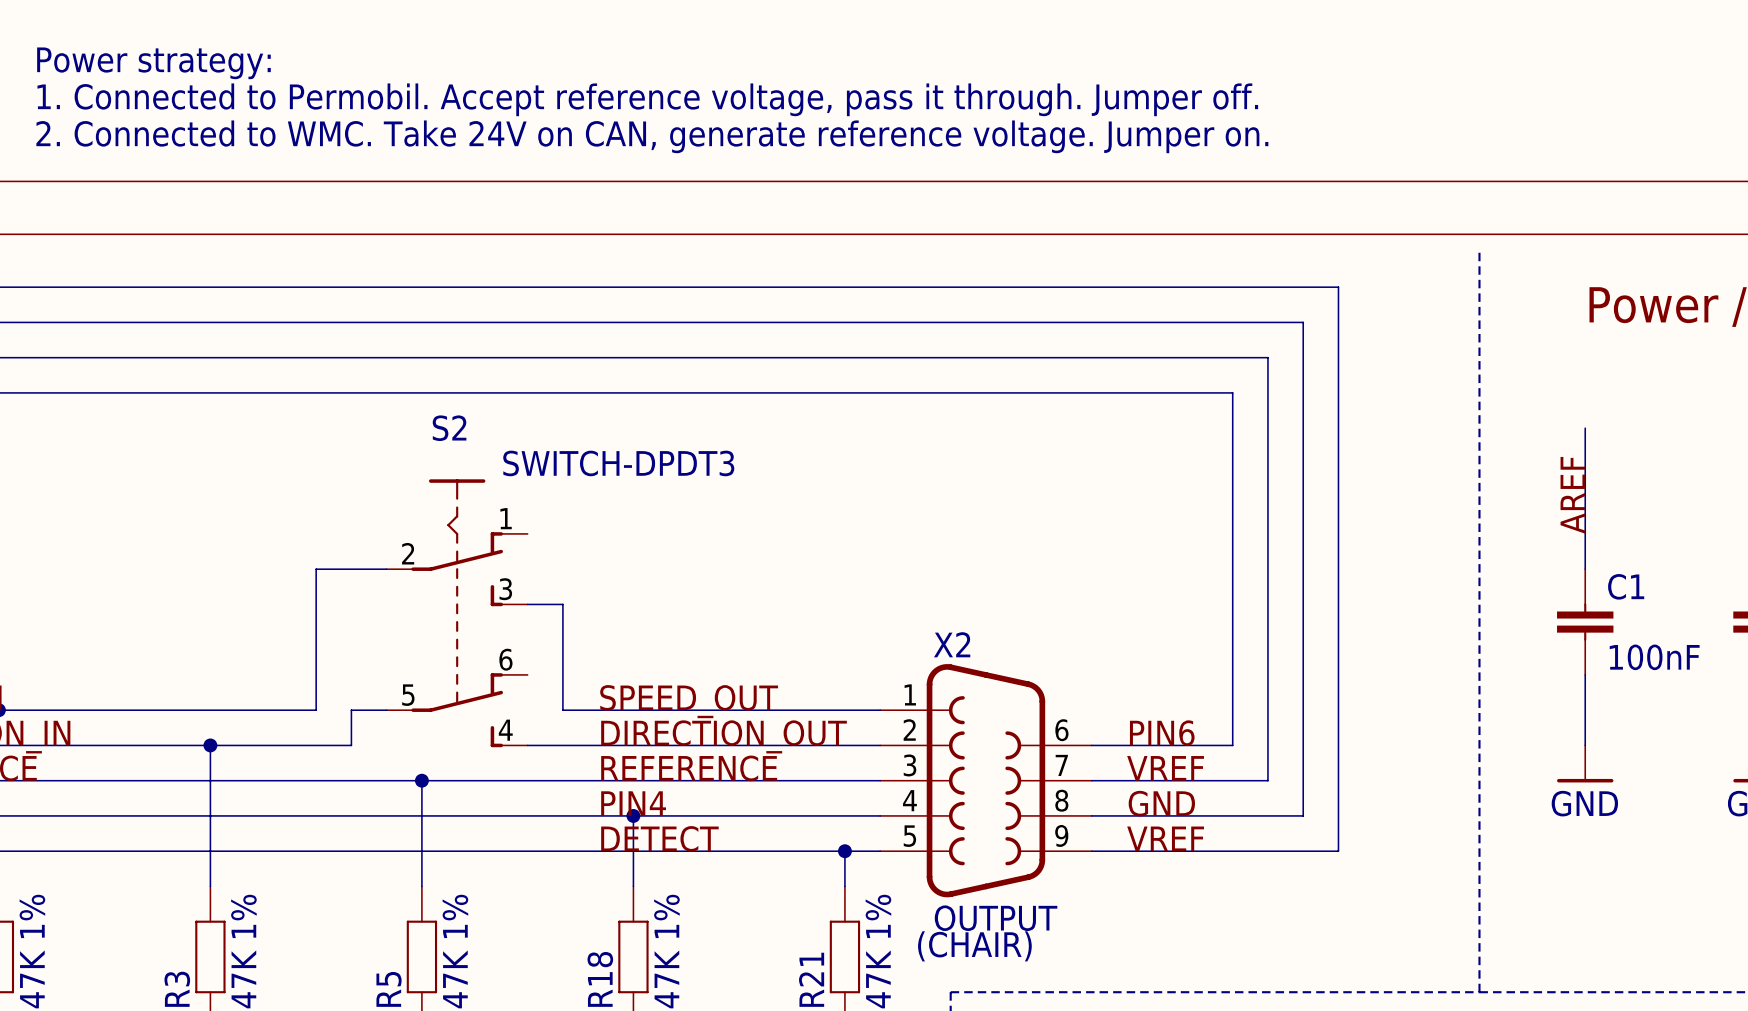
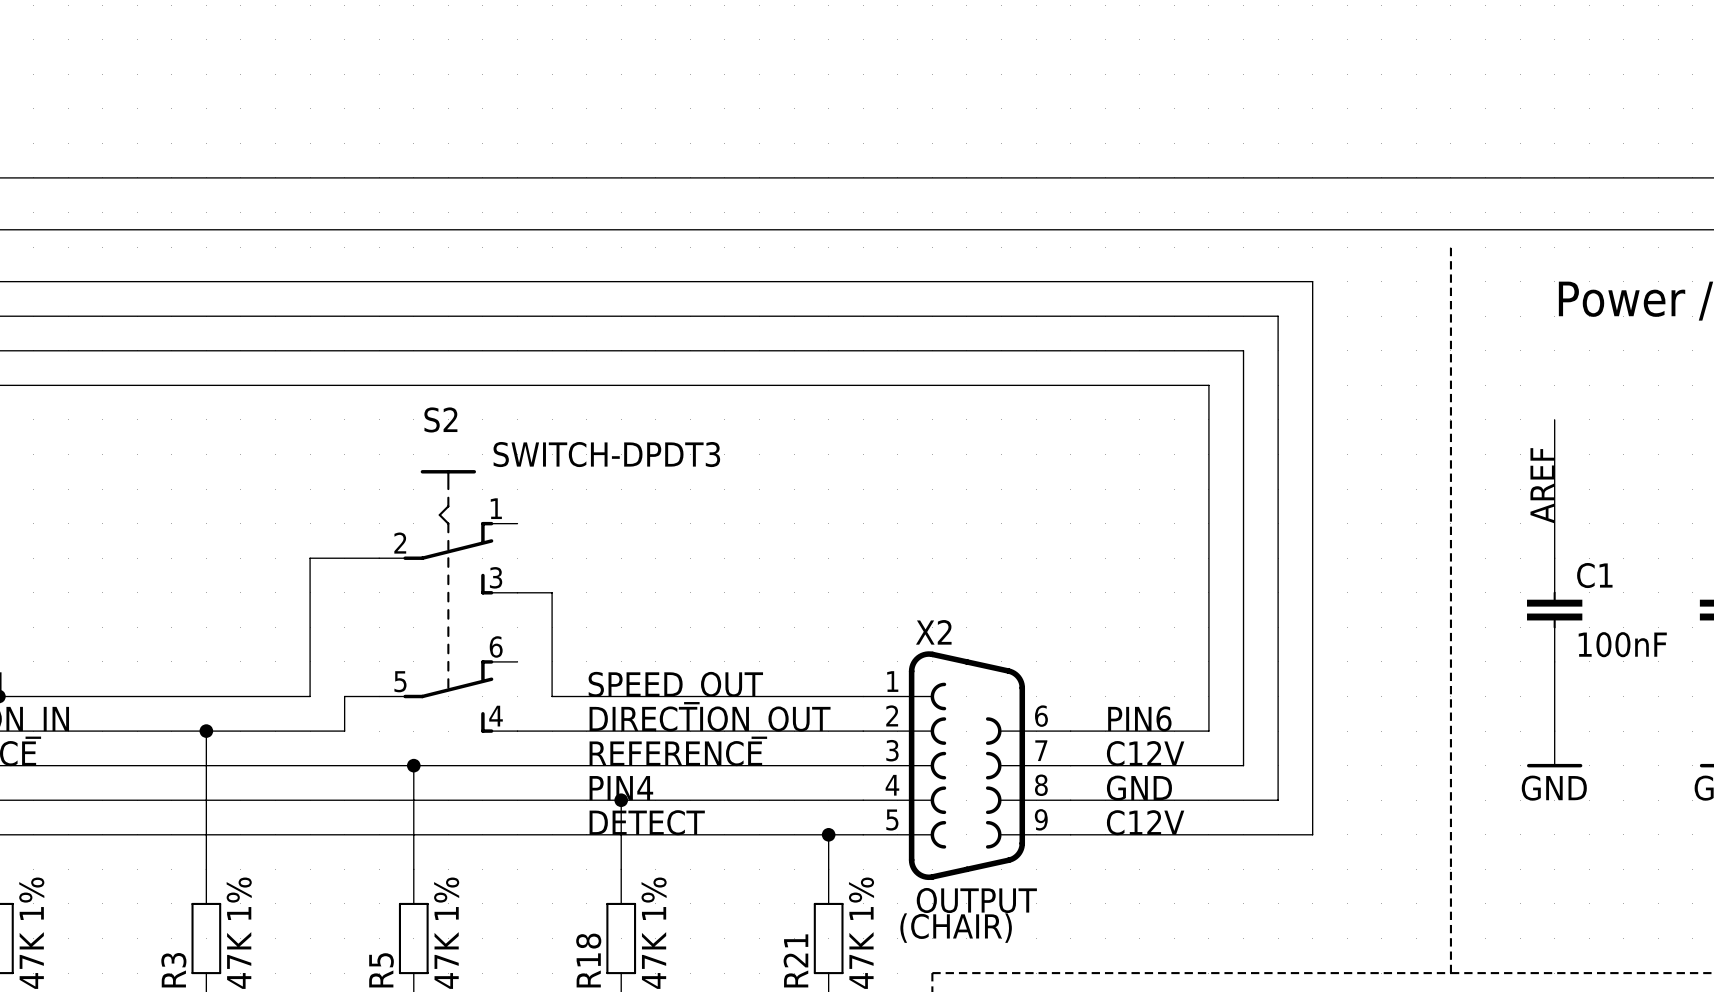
text: Power strategy: (153, 63) -> none
text: 1. Connected to Permobil. Accept reference voltage, pass it through. Jumper off. (647, 99) -> none
text: 2. Connected to WMC. Take 24V on CAN, generate reference voltage. Jumper on. (652, 136) -> none
label: VREF (1165, 768) -> C12V (1145, 753)
label: VREF (1165, 838) -> C12V (1145, 822)

